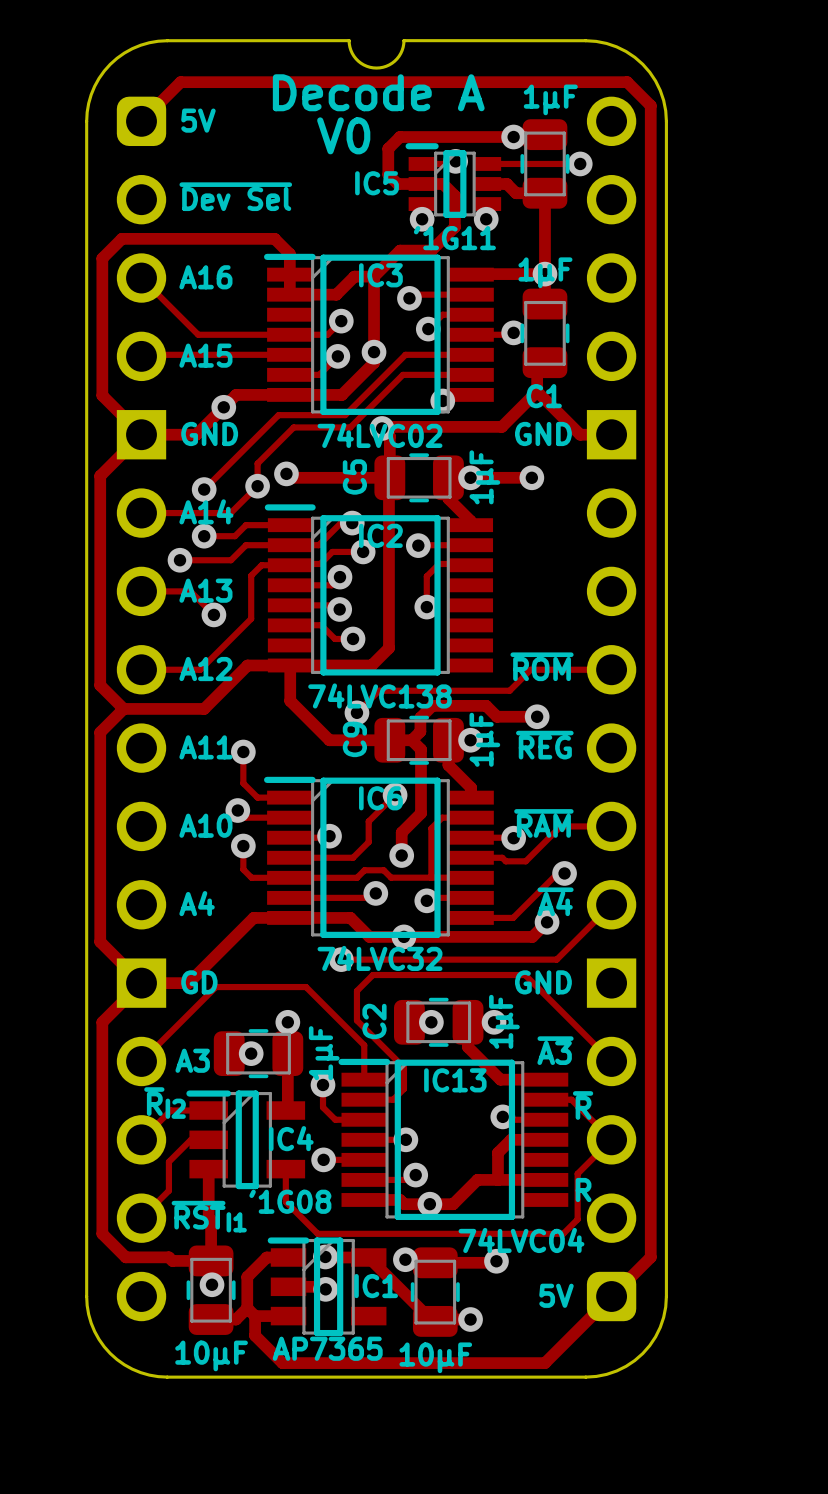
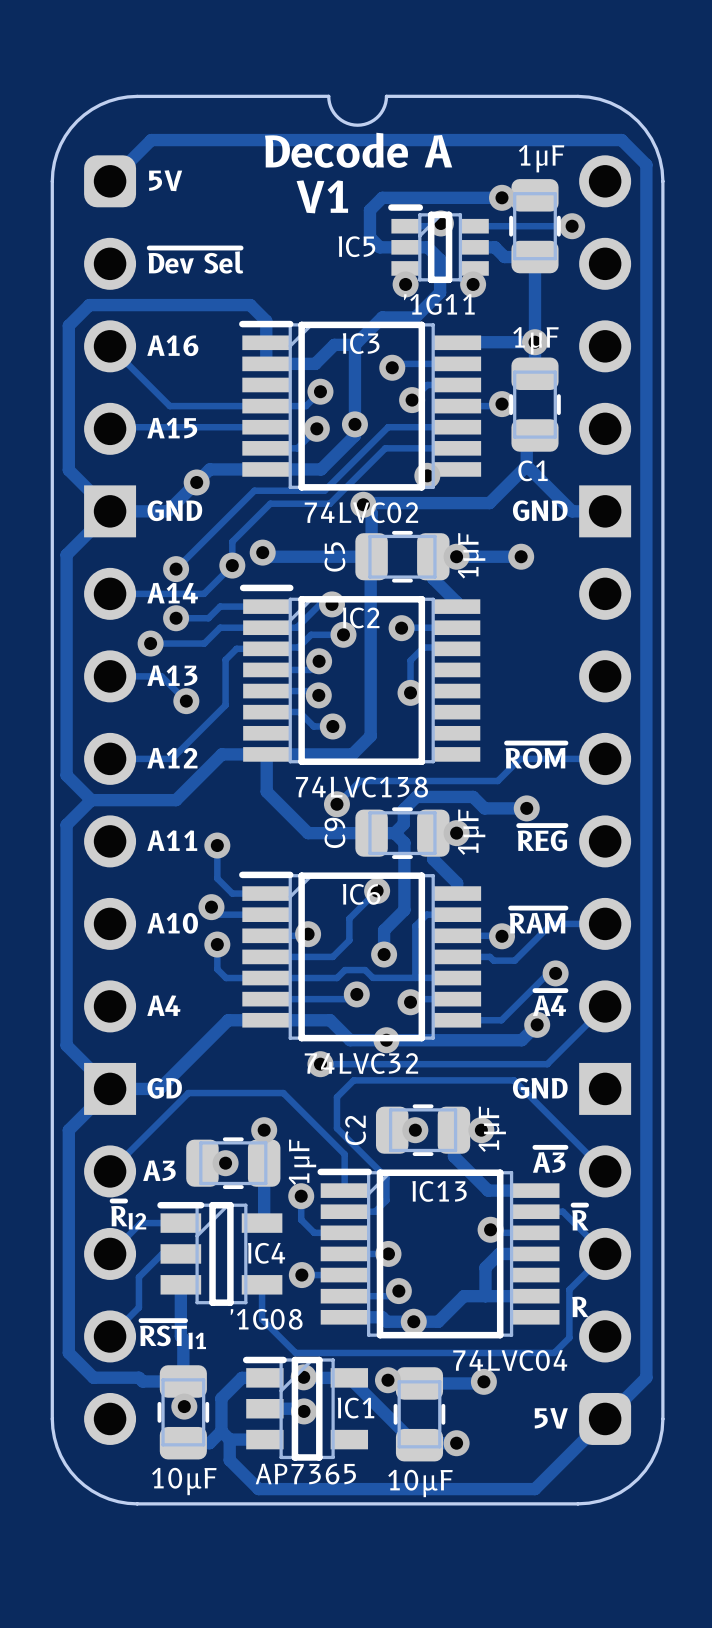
text: V0 (343, 135) -> V1 (322, 196)

